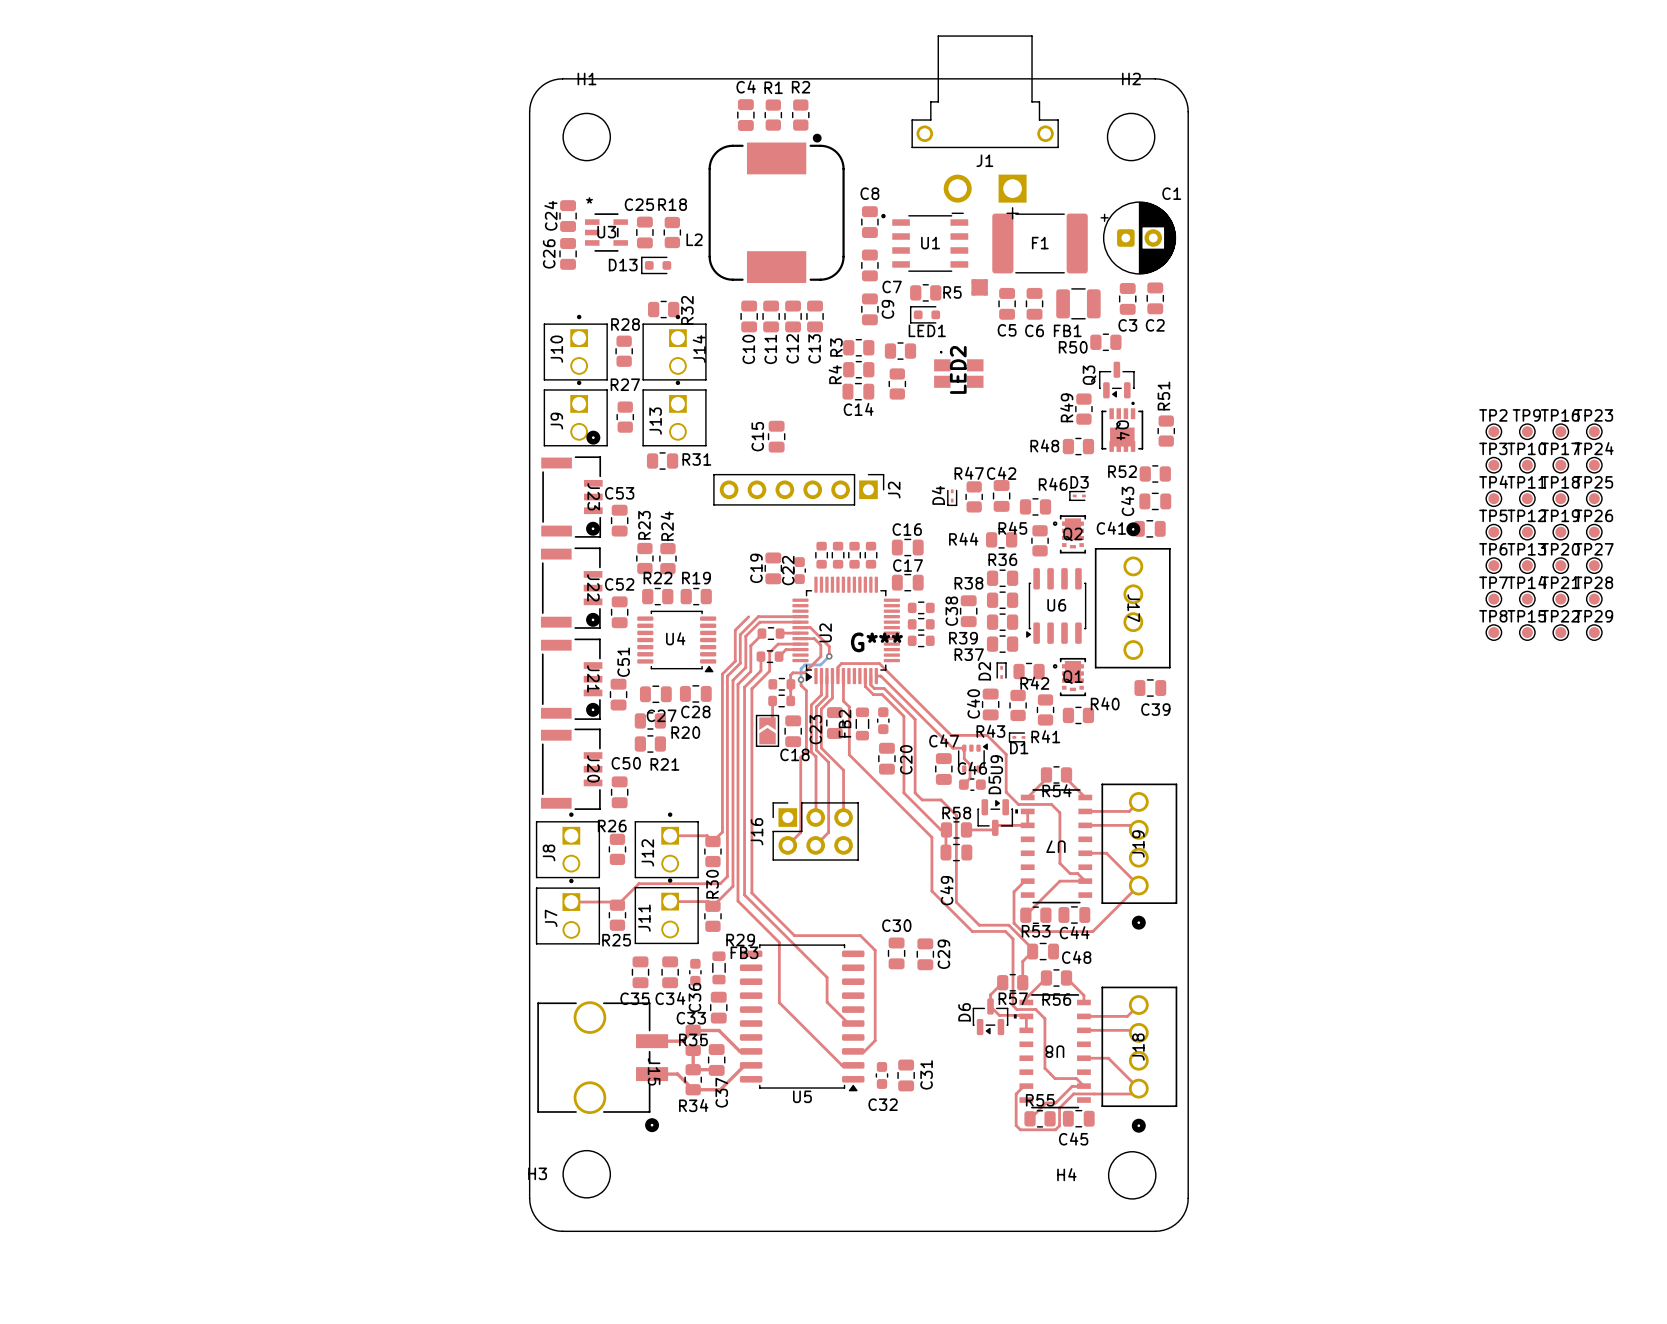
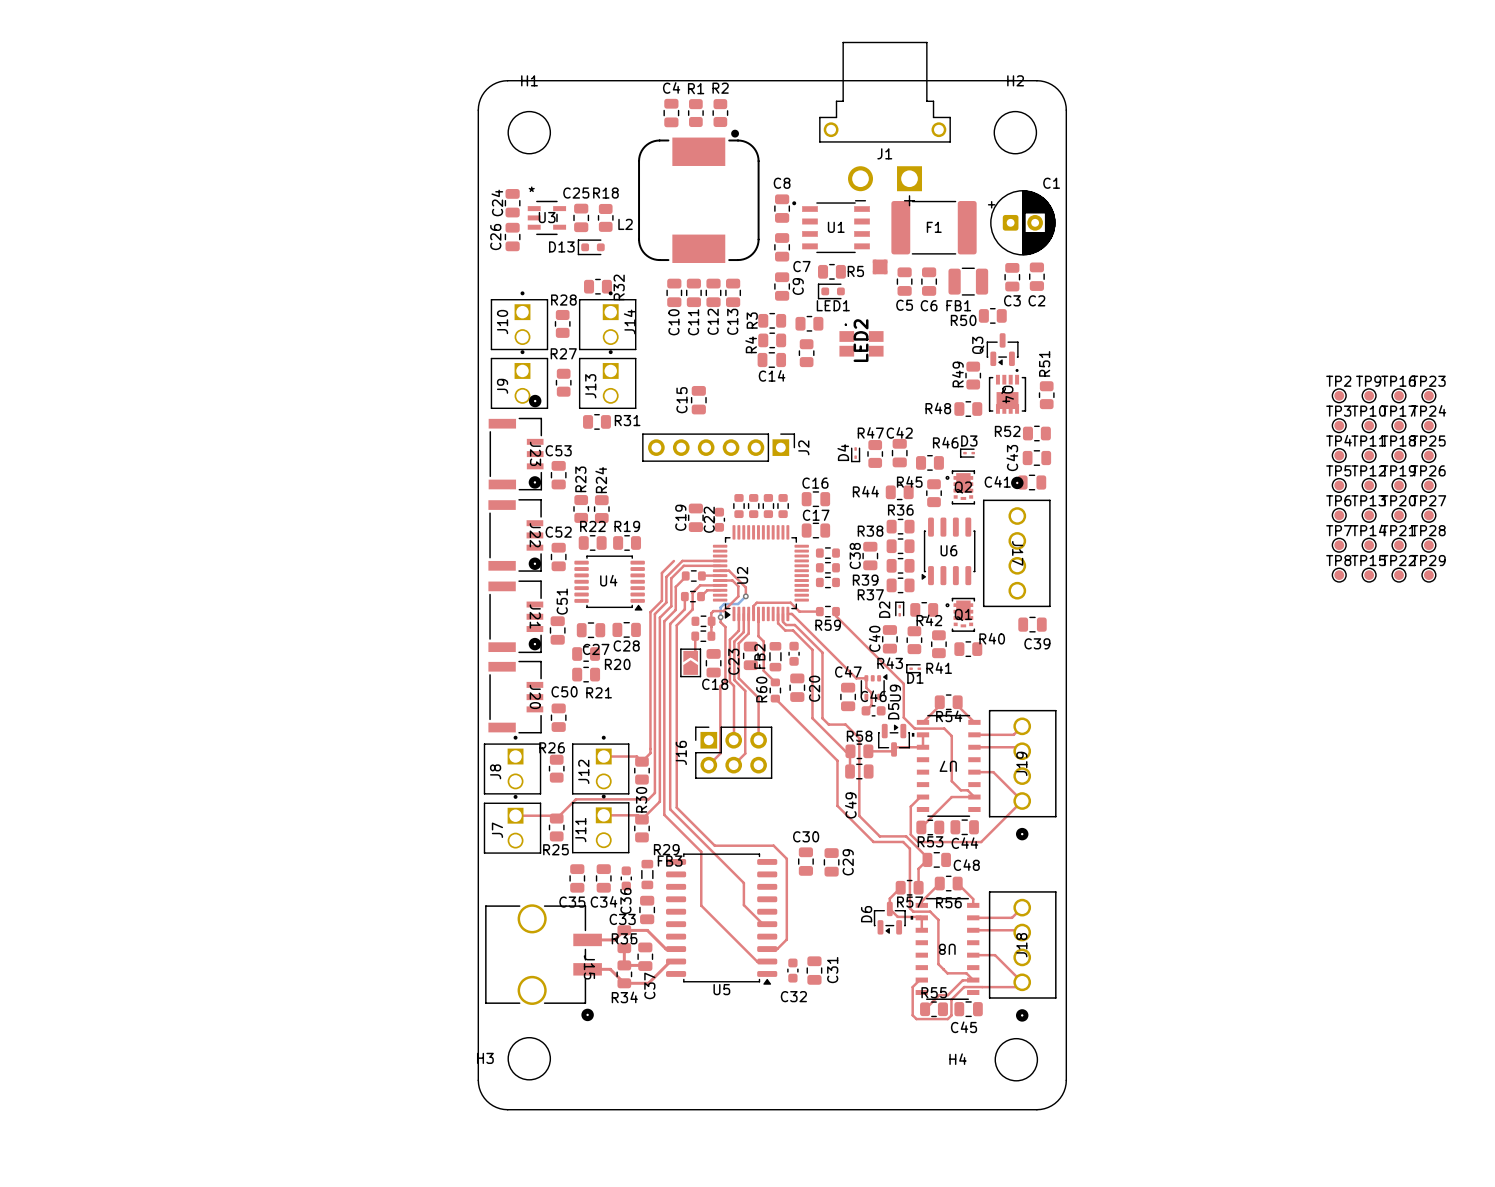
G***: (876, 642) -> none
top track: (889, 673) (951, 735) (987, 735) -> (836, 611) (836, 616) (886, 666)
top track: none -> (799, 611) (819, 611)
R59: none -> (827, 611)
top track: (849, 739) (849, 754) (931, 837) (931, 840) -> (775, 698) (837, 760)
top track: none -> (763, 670) (775, 682)
R60: none -> (775, 690)

